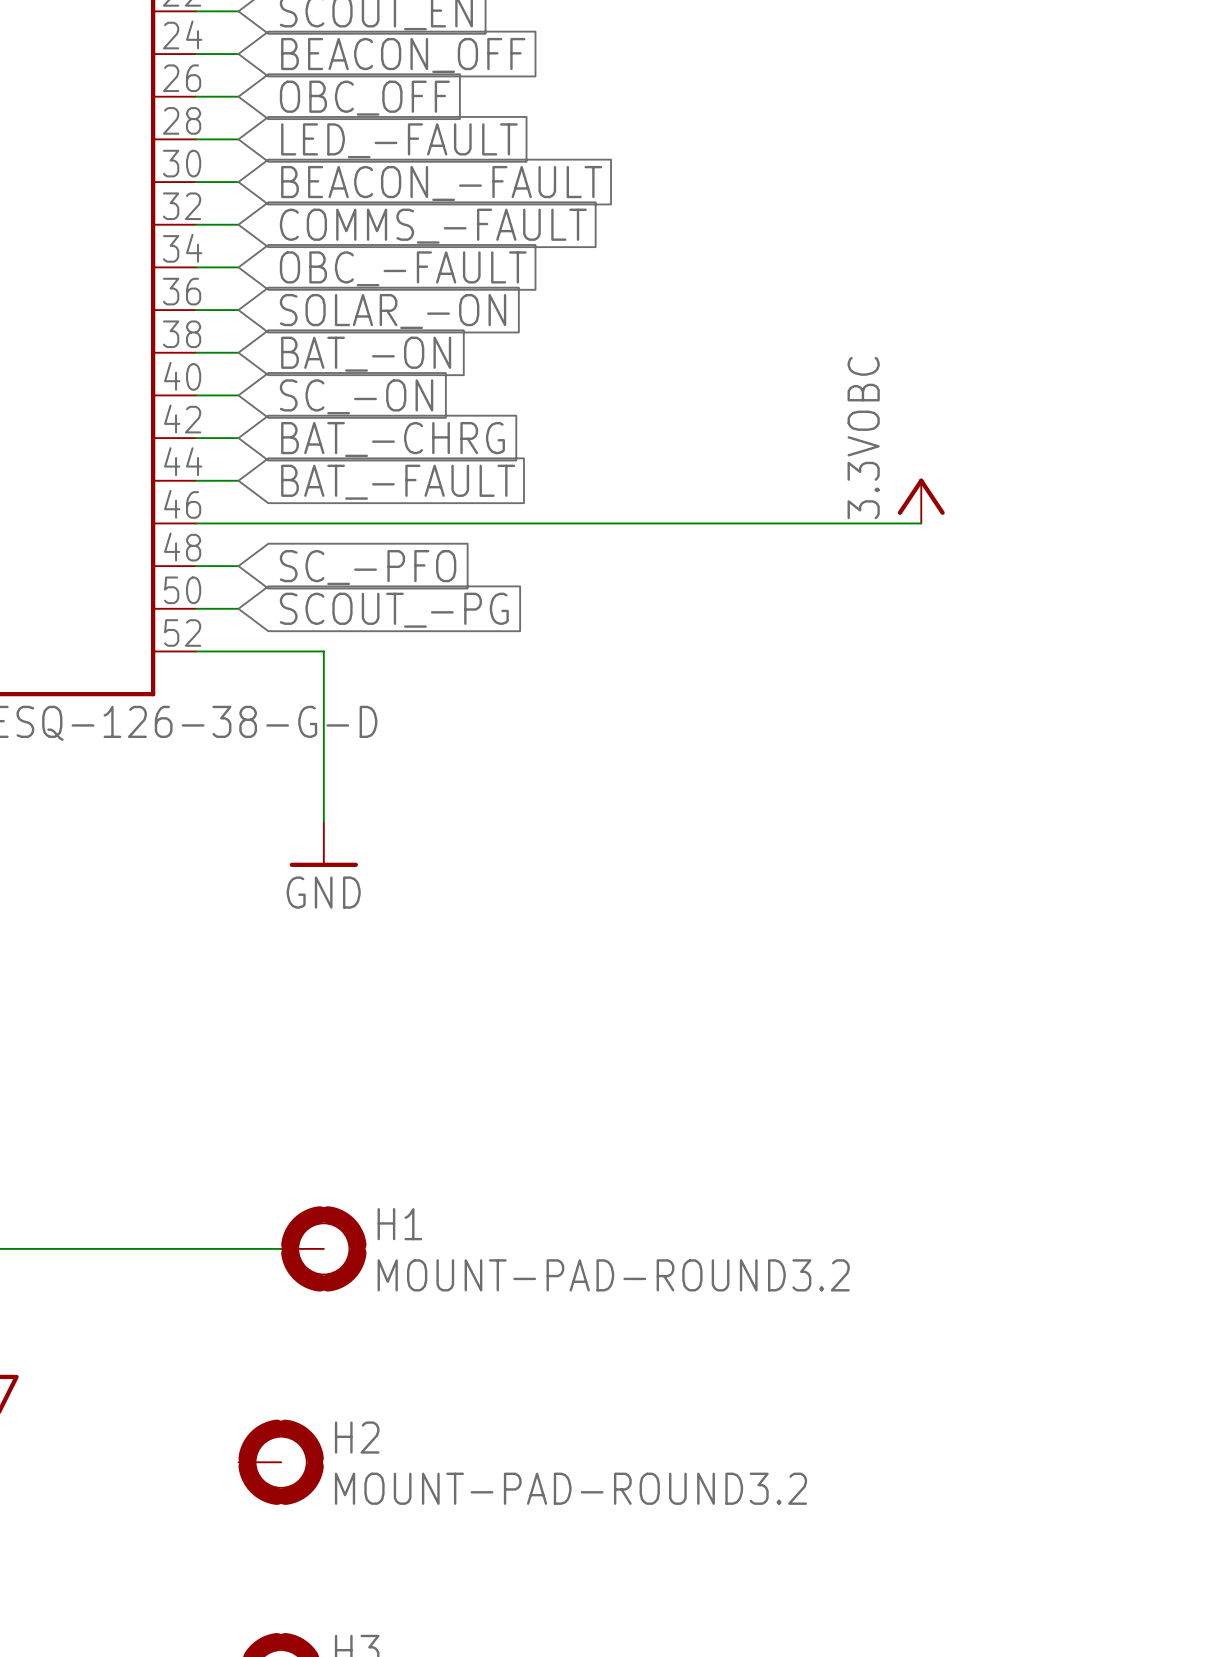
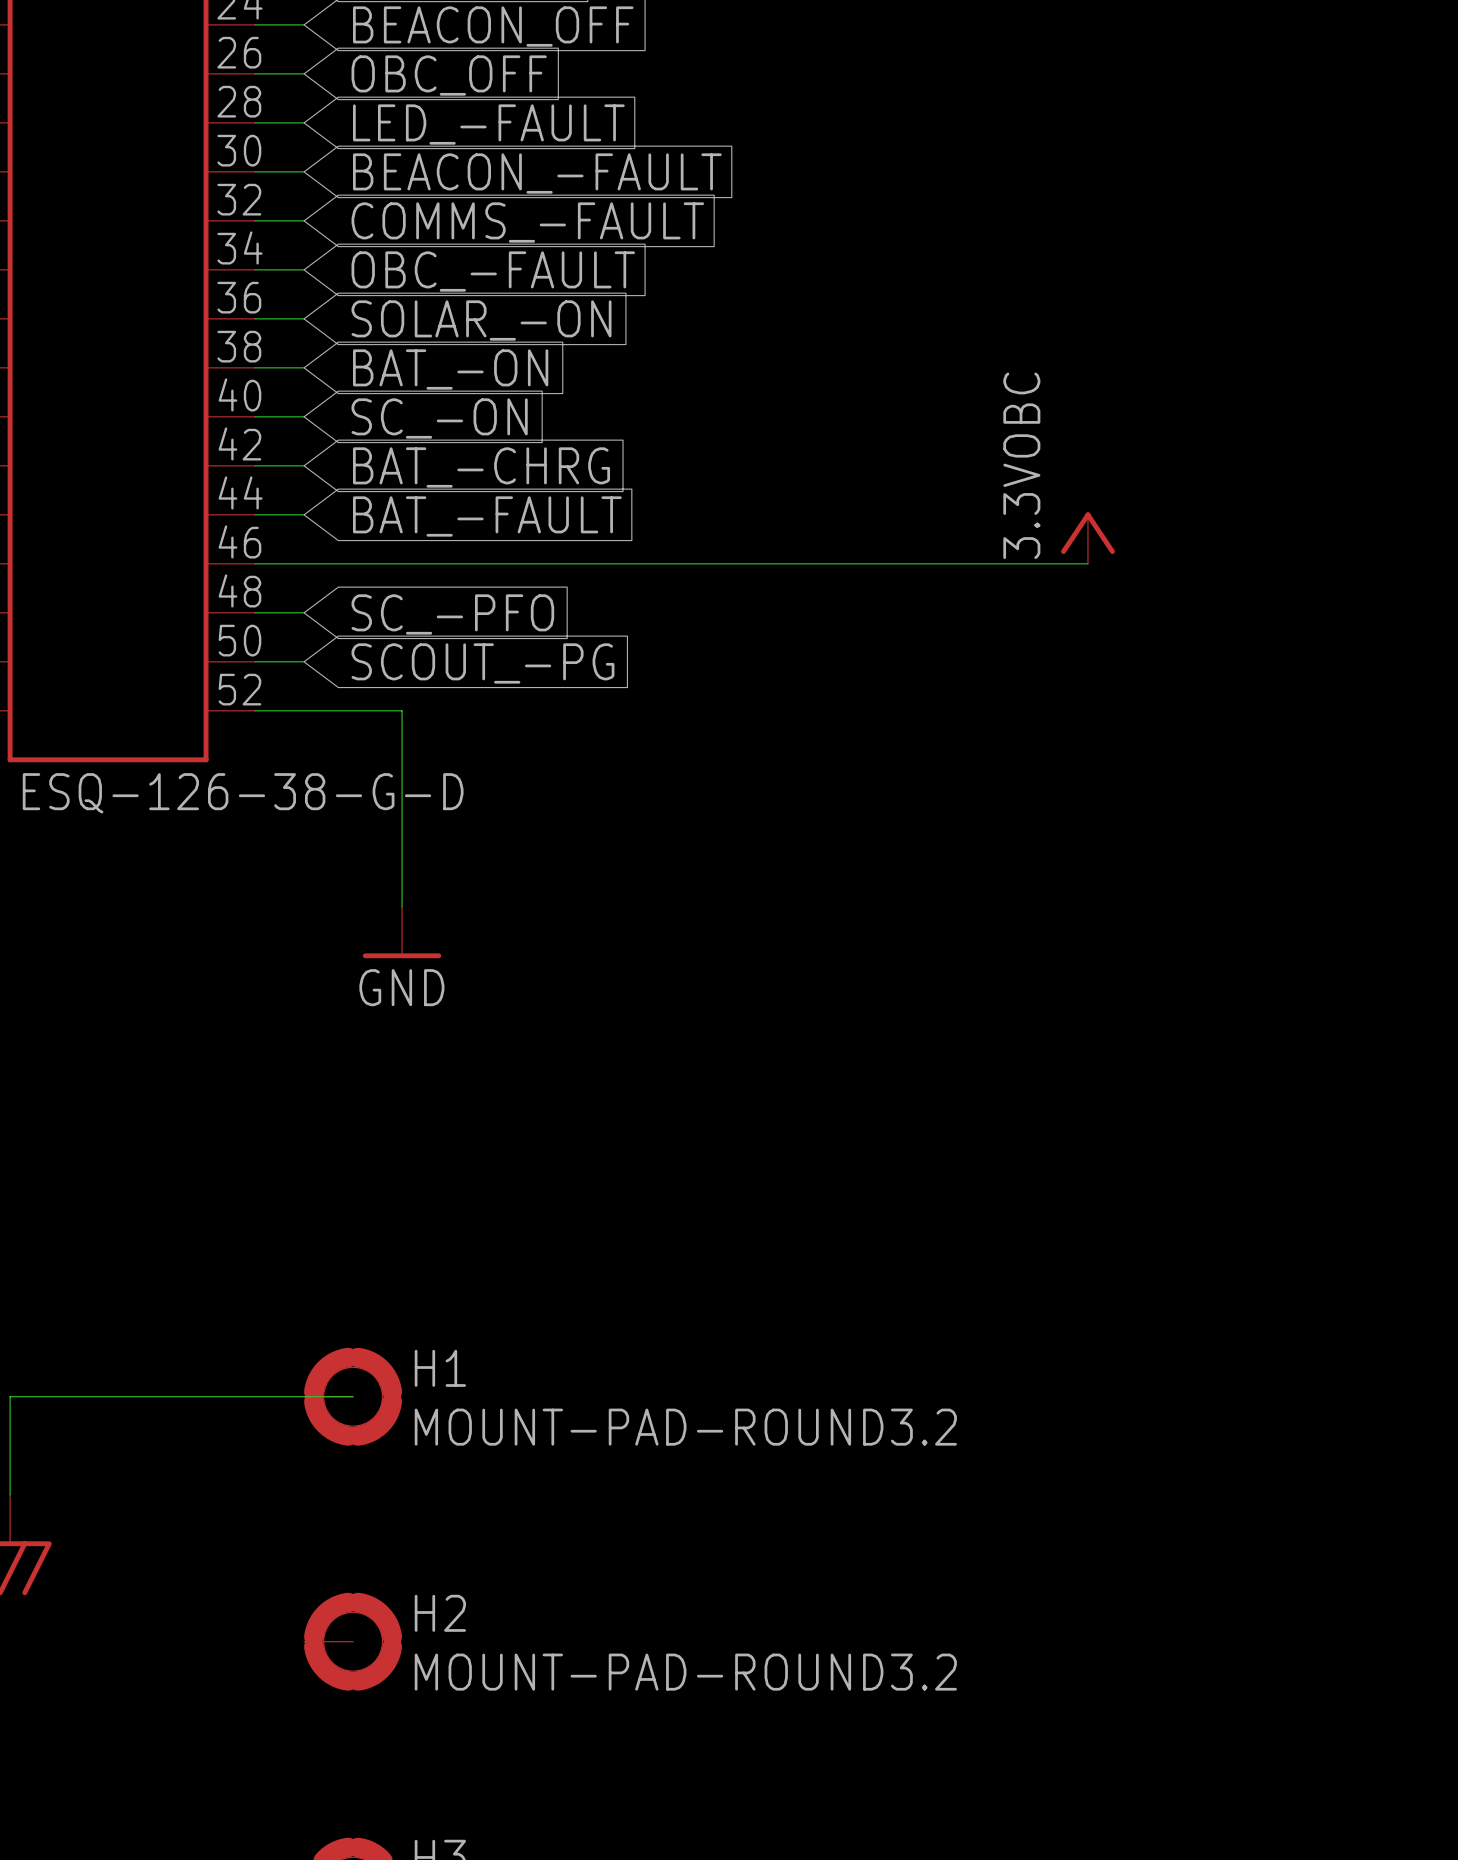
H1 position: (323, 1248) -> (353, 1396)

